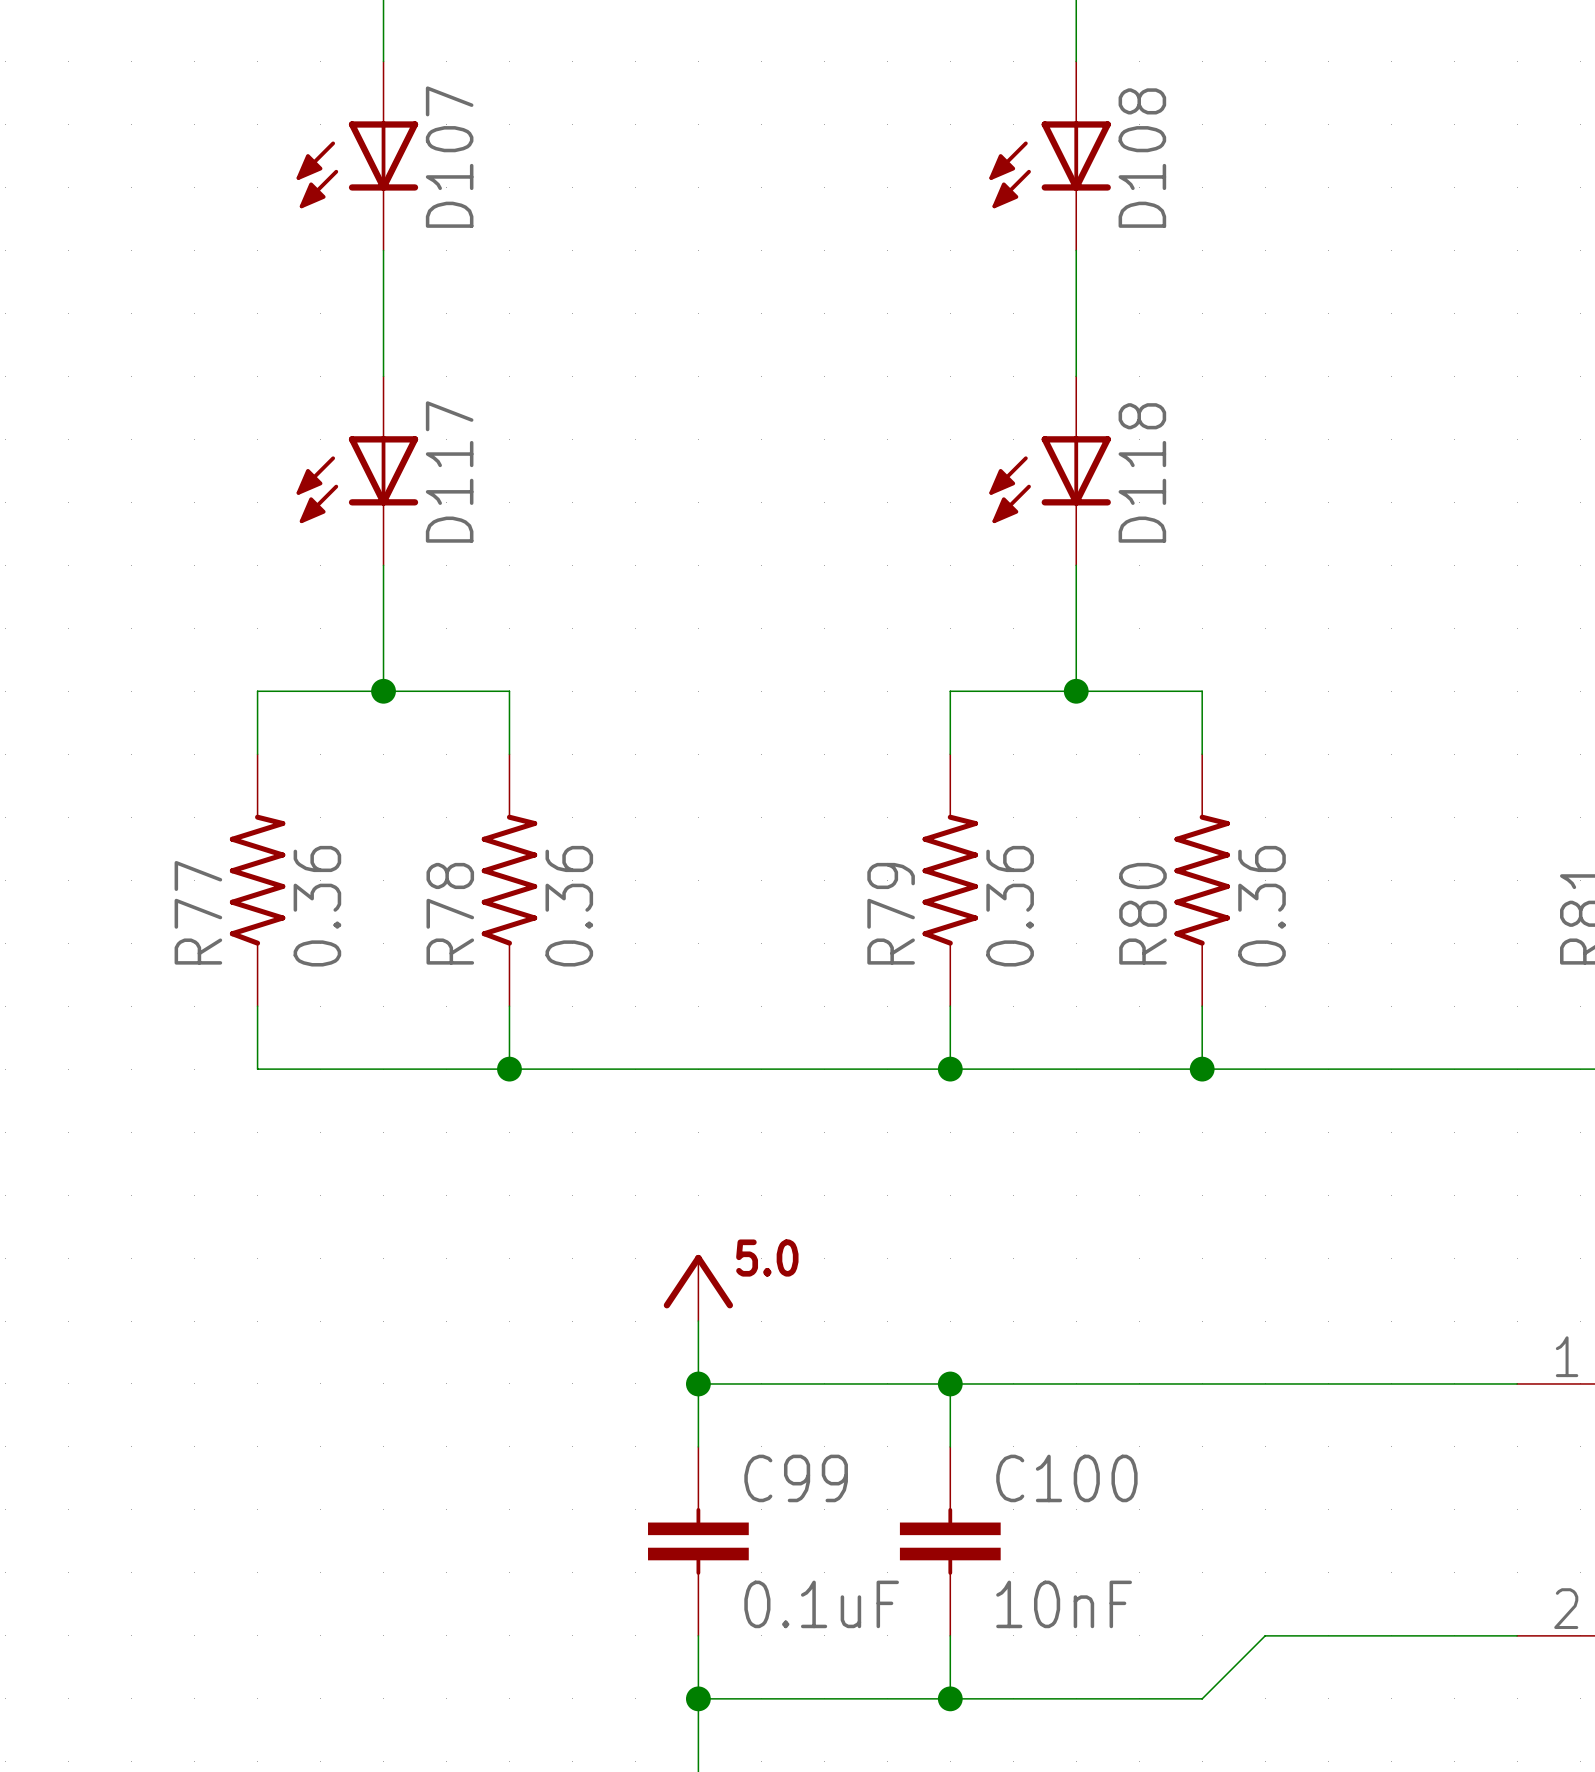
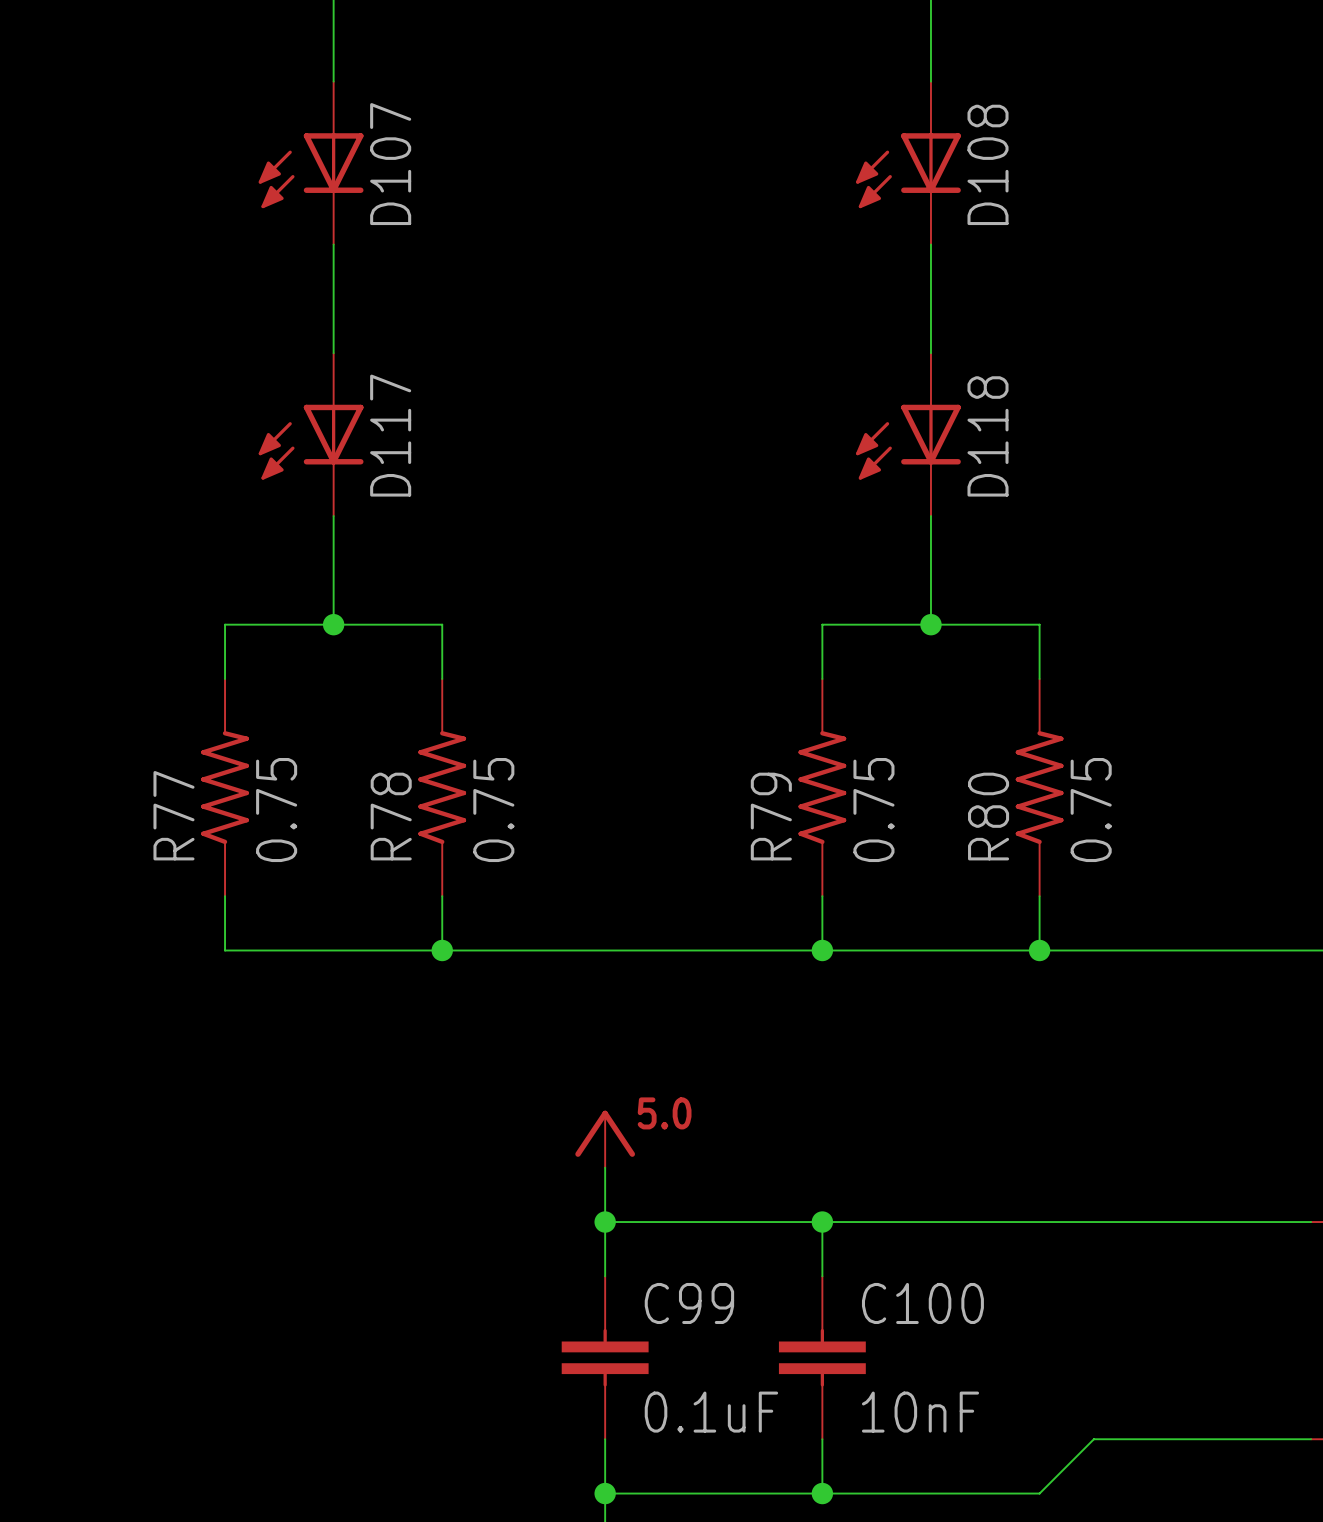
R77 value: 0.36 (317, 906) -> 0.75 (276, 810)
R78 value: 0.36 (569, 906) -> 0.75 (493, 810)
R79 value: 0.36 (1010, 906) -> 0.75 (873, 810)
R80 value: 0.36 (1262, 906) -> 0.75 (1091, 810)

